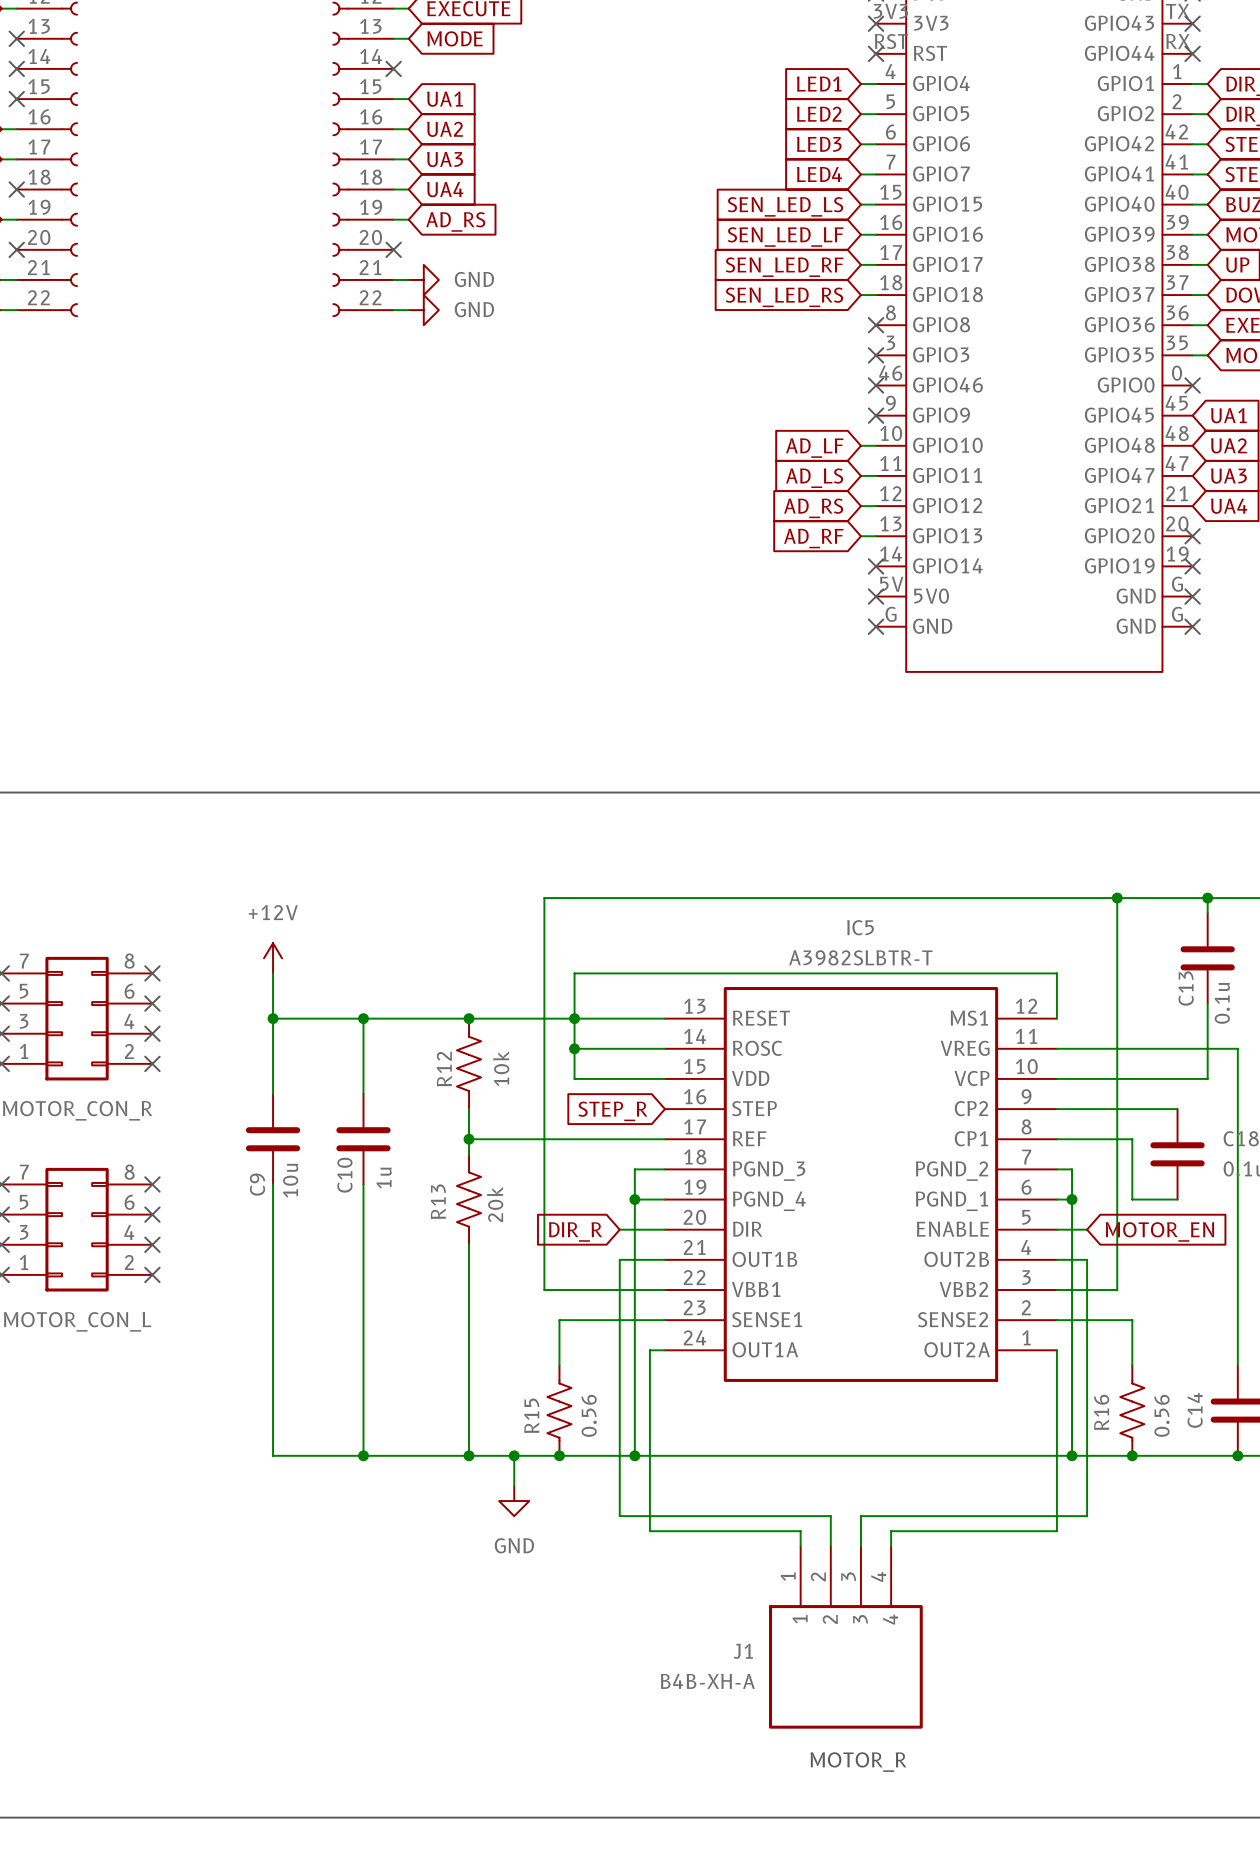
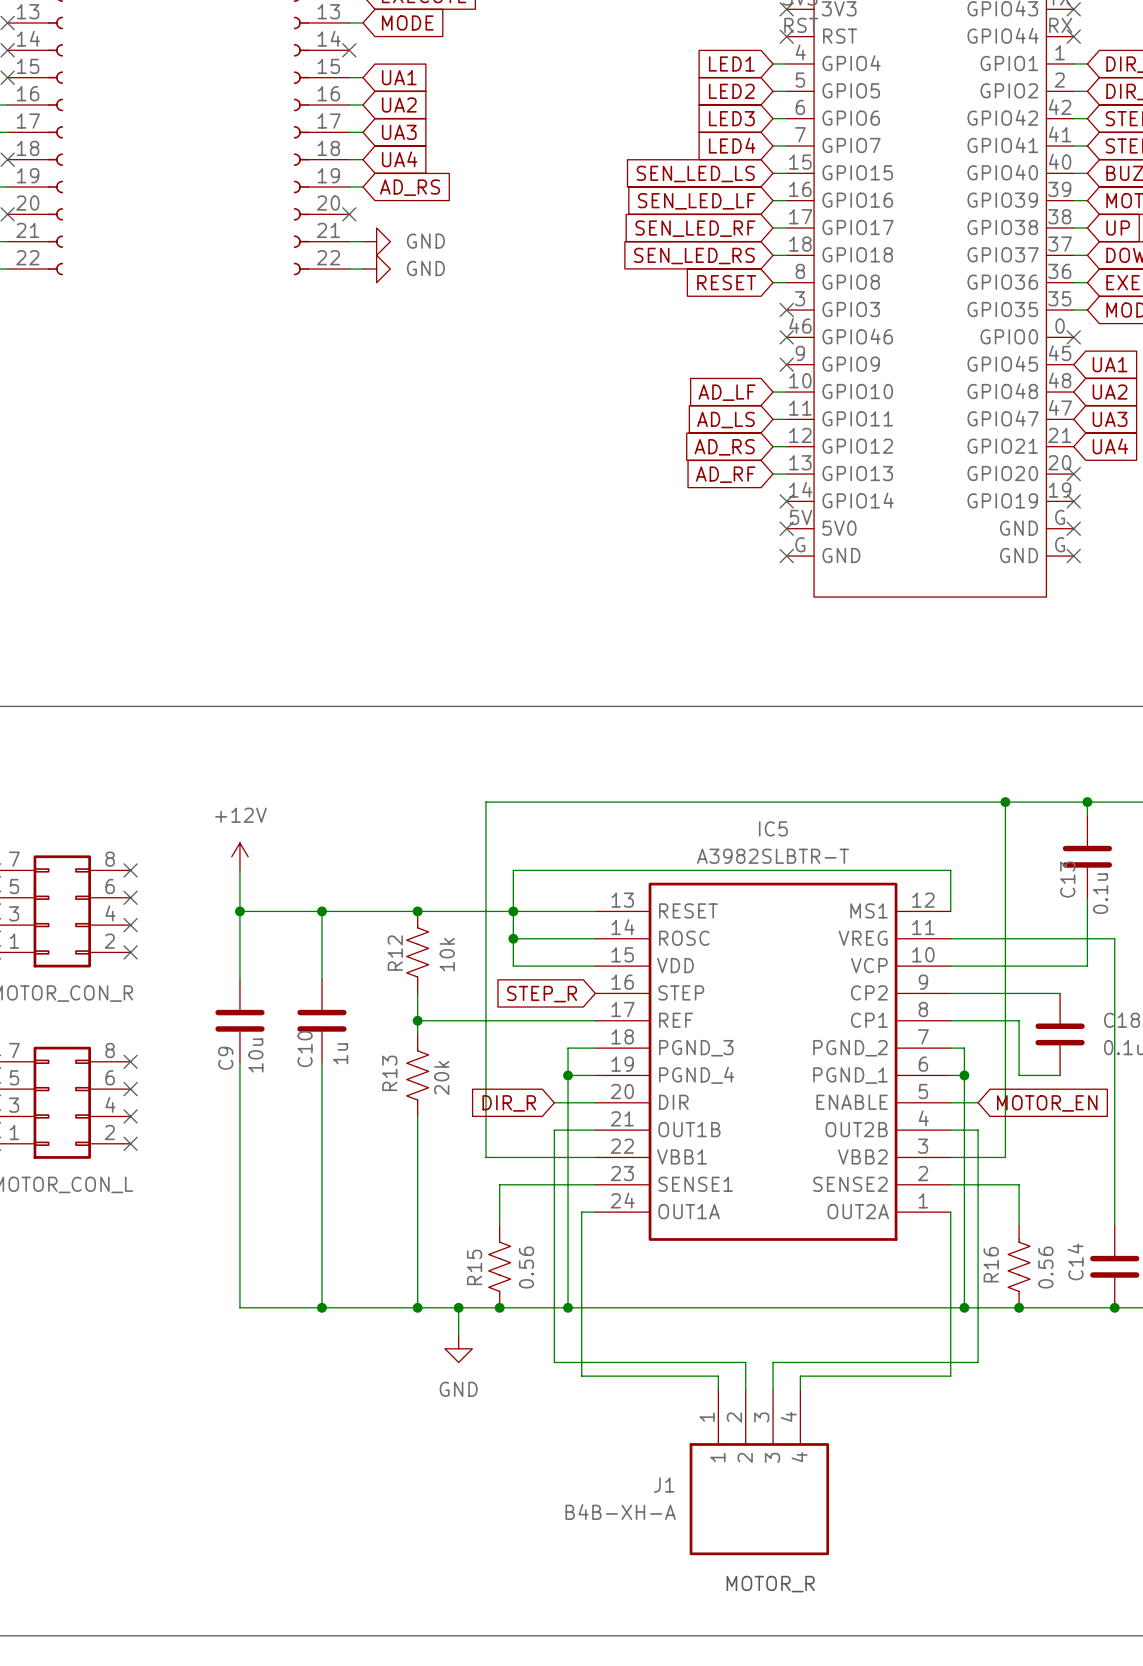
global label: none -> RESET (726, 282)
wire: none -> (773, 282) (786, 282)
no-connect mark: (876, 325) -> none

